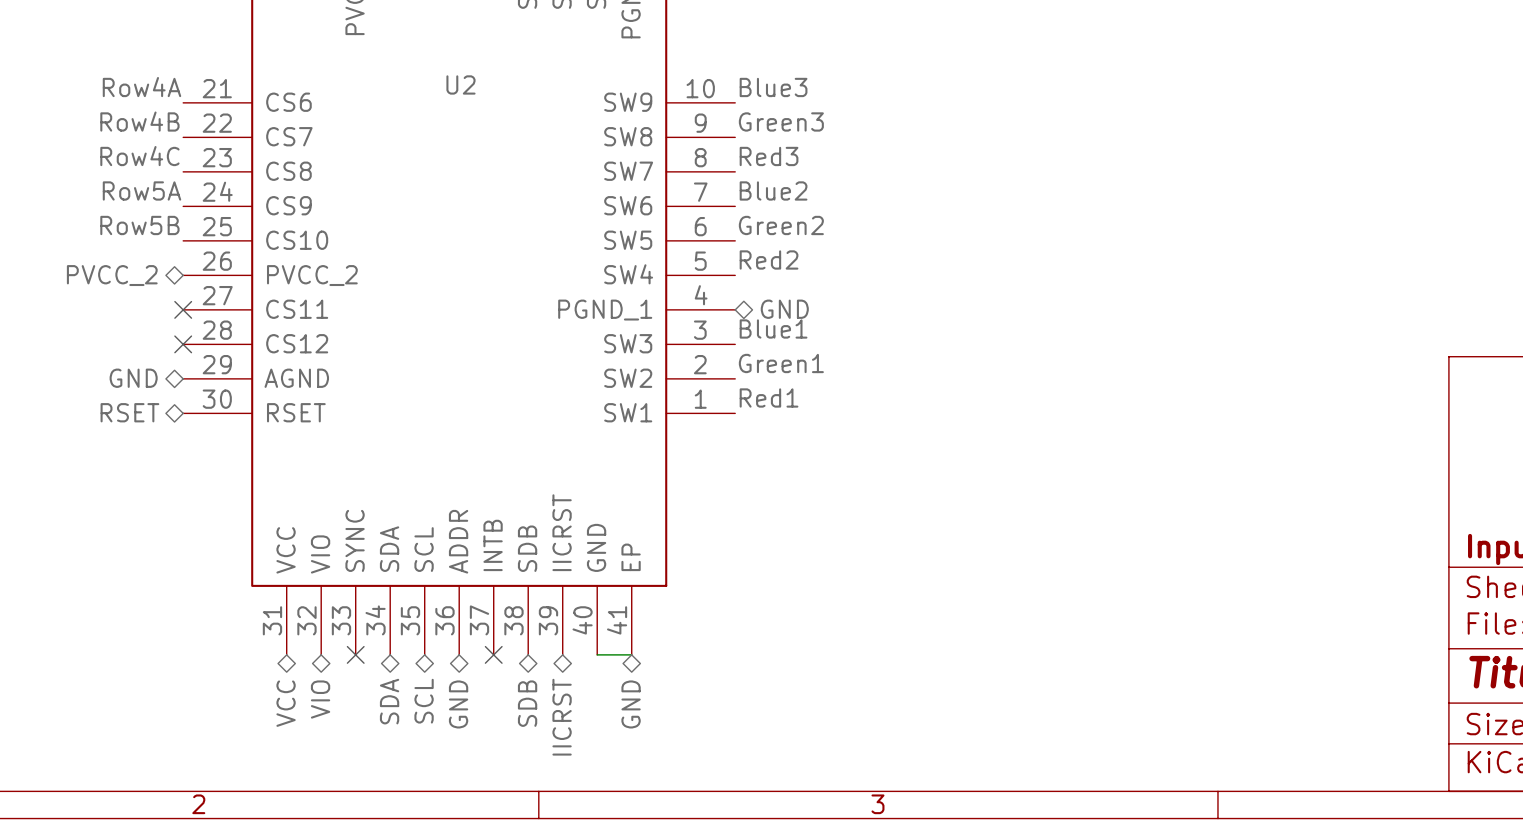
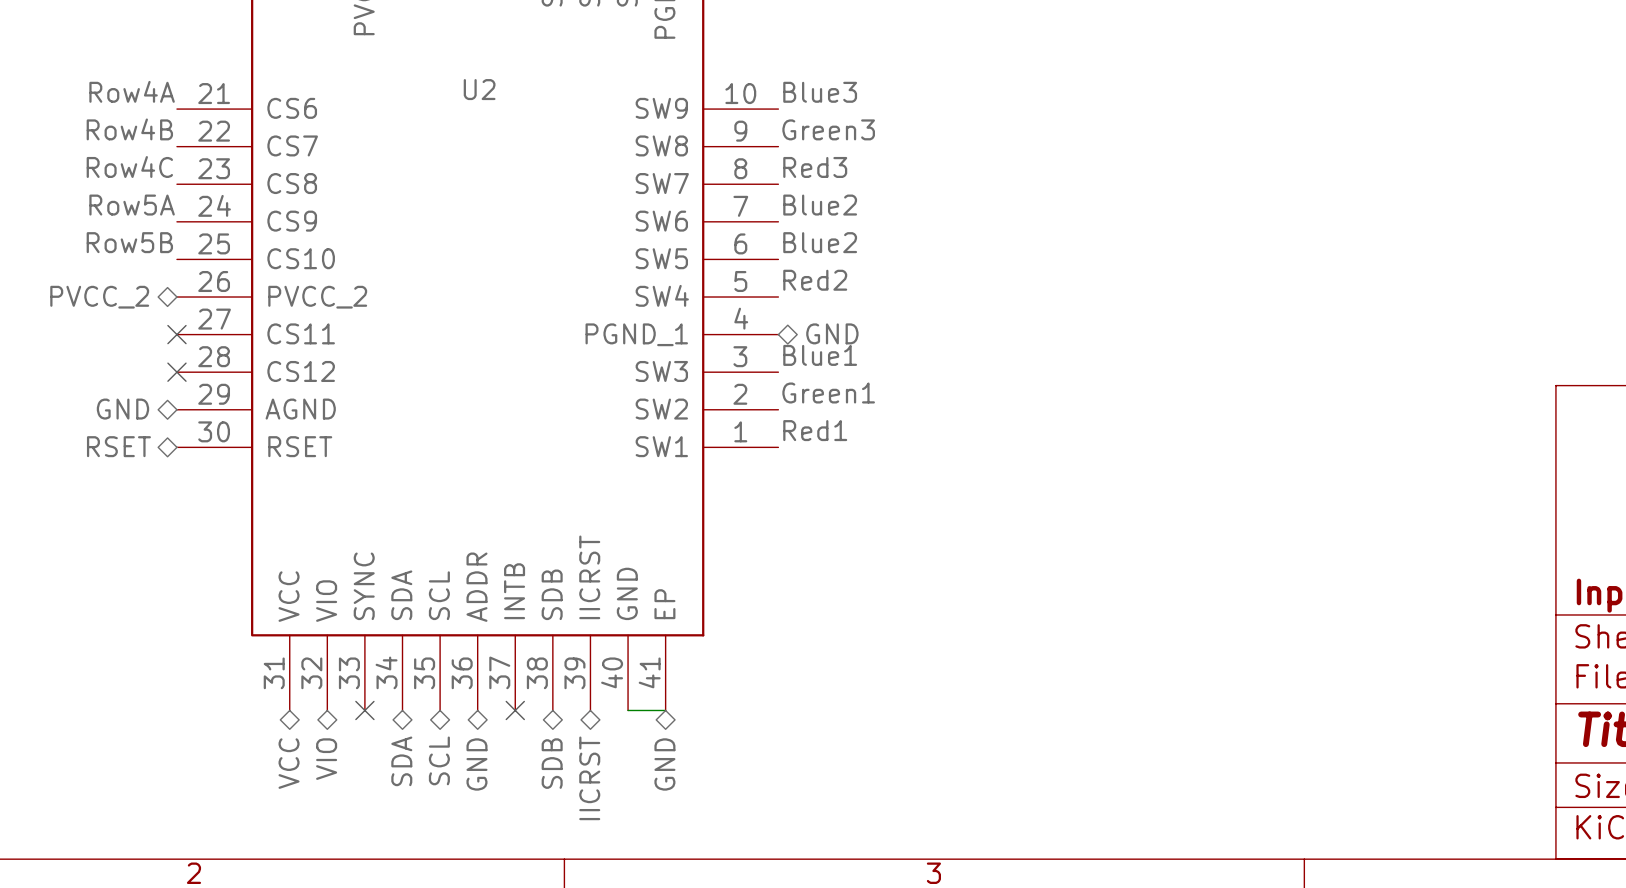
label: Green2 (781, 225) -> Blue2 (820, 242)

